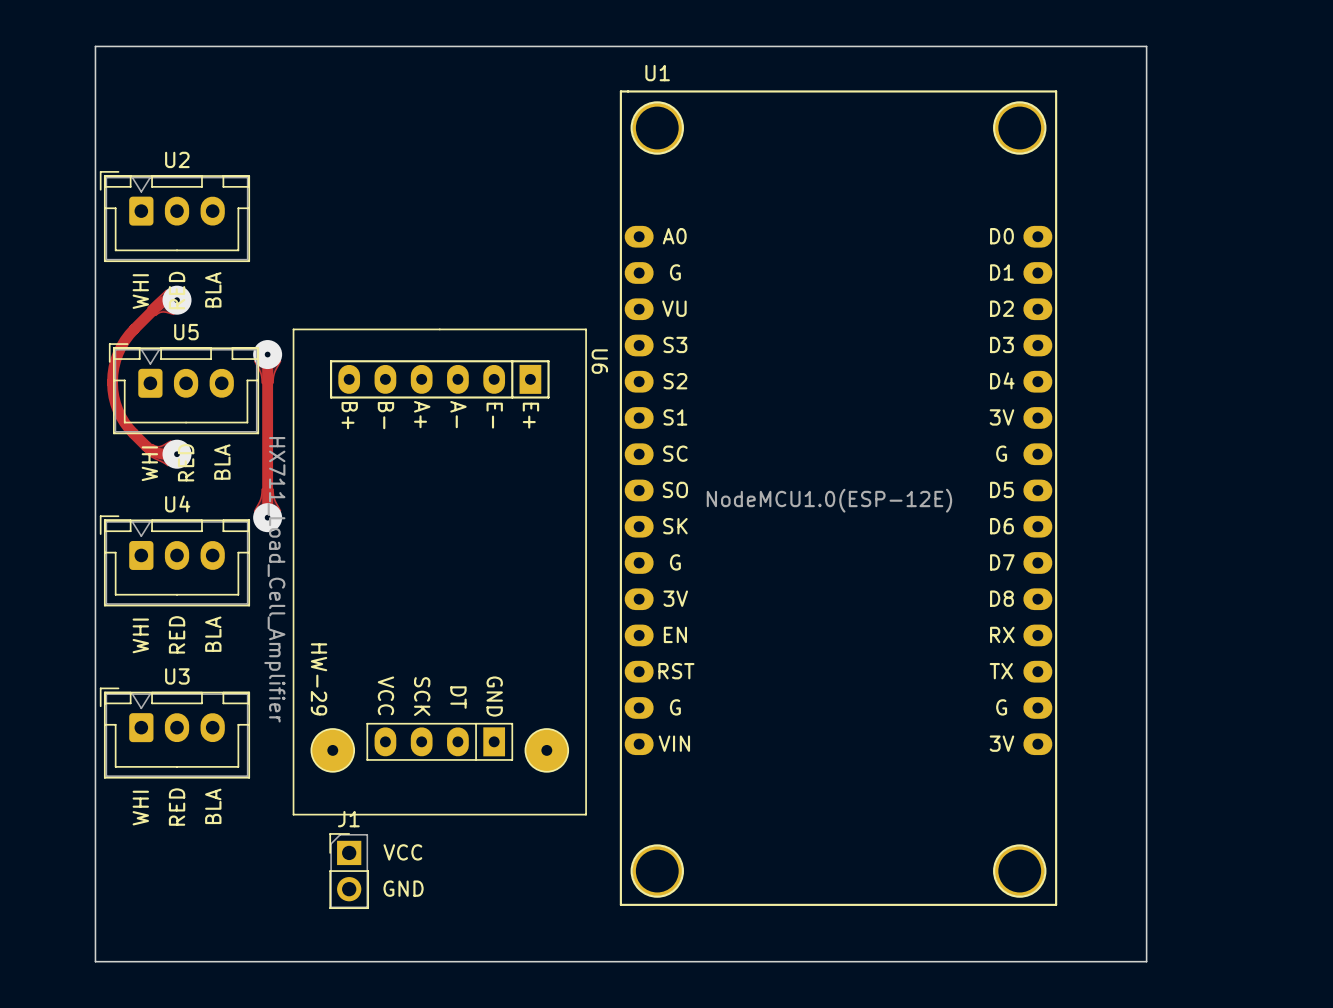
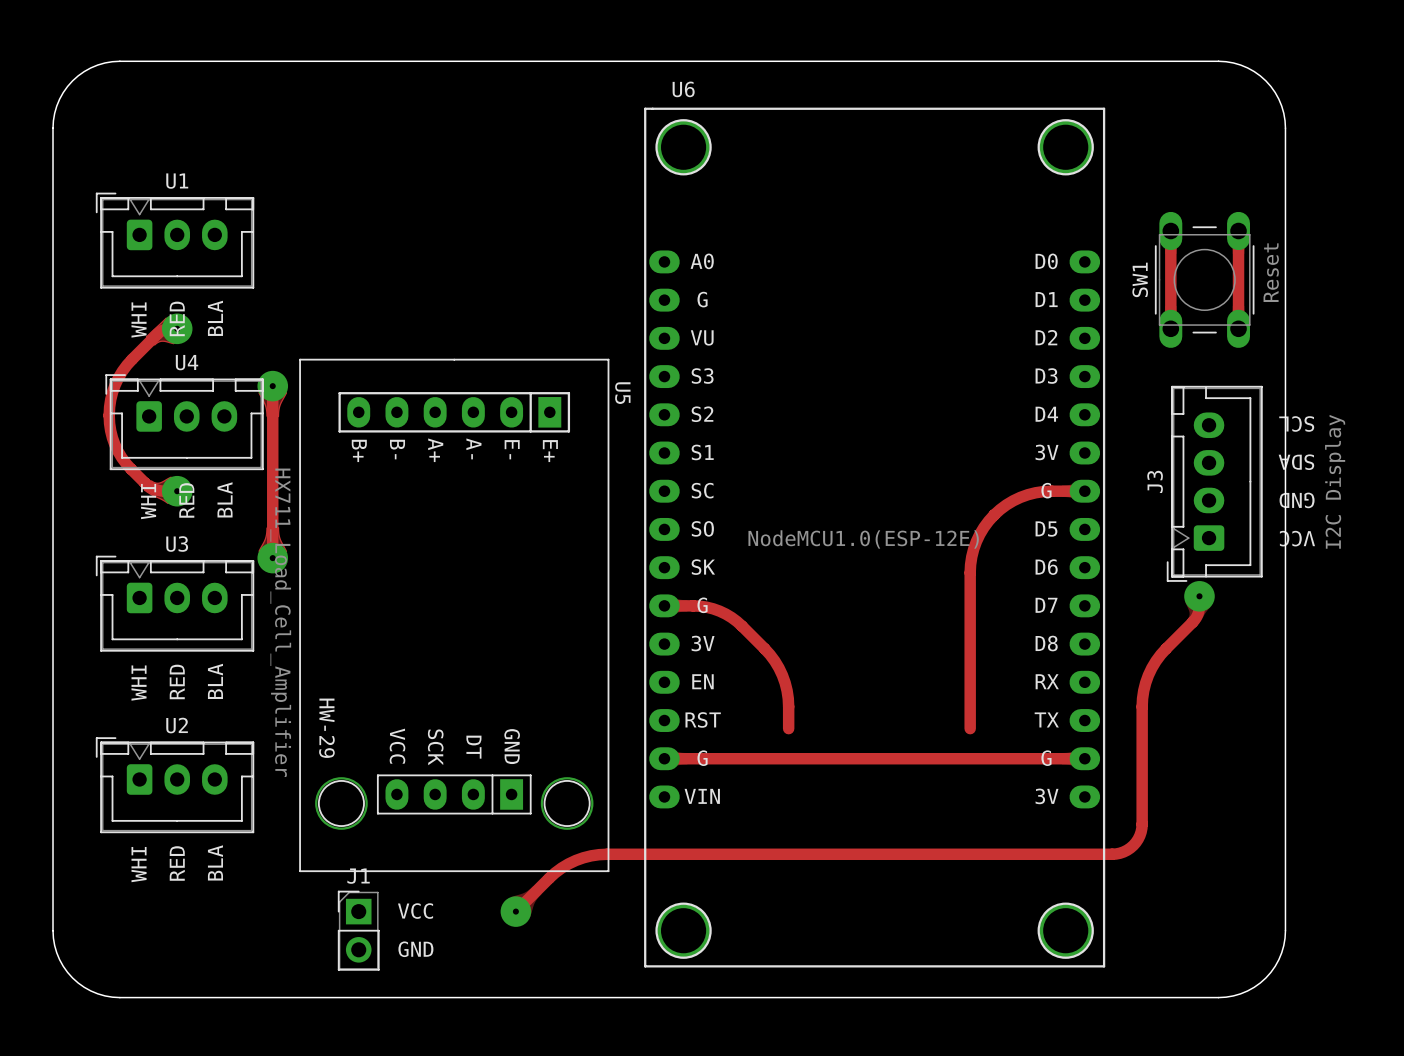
board edge: (122, 46) (95, 46) (95, 961) (1146, 961) (1146, 46) -> (119, 61) (105, 62) (90, 67) (72, 80) (59, 99) (54, 113) (53, 128) (53, 930) (54, 945) (59, 959) (67, 972) (78, 982) (97, 993) (119, 997) (1218, 997) (1233, 995) (1247, 990) (1265, 977) (1278, 959) (1285, 938) (1285, 128) (1283, 113) (1278, 99) (1270, 86) (1260, 75) (1247, 67) (1233, 62) (1199, 61)
U1 name: U1 (657, 73) -> U6 (683, 89)
U2 name: U2 (177, 159) -> U1 (177, 181)
track: none -> (1170, 231) (1170, 328)
track: none -> (1238, 231) (1238, 328)
SW1: none -> Reset (1204, 279)
U5 name: U5 (186, 332) -> U4 (187, 362)
J3: none -> I2C Display (1214, 483)
track: none -> (1084, 491) (1043, 491) (1020, 497) (1006, 504) (994, 514) (979, 534) (973, 549) (970, 564) (970, 728)
U4 name: U4 (177, 503) -> U3 (177, 544)
track: none -> (1199, 596) (1199, 608) (1196, 617) (1160, 654) (1151, 668) (1145, 682) (1142, 706) (1141, 828) (1135, 842) (1123, 851) (1112, 854) (599, 854) (583, 857) (561, 868) (515, 911)
via: none -> (1199, 596)
track: none -> (664, 605) (699, 606) (713, 608) (725, 614) (742, 626) (770, 654) (782, 675) (788, 698) (788, 728)
U6: HX711_Load_Cell_Amplifier (439, 572) -> none
U5: none -> HX711_Load_Cell_Amplifier (454, 615)
U3 name: U3 (177, 676) -> U2 (177, 725)
track: none -> (664, 758) (1084, 758)
via: none -> (515, 911)

